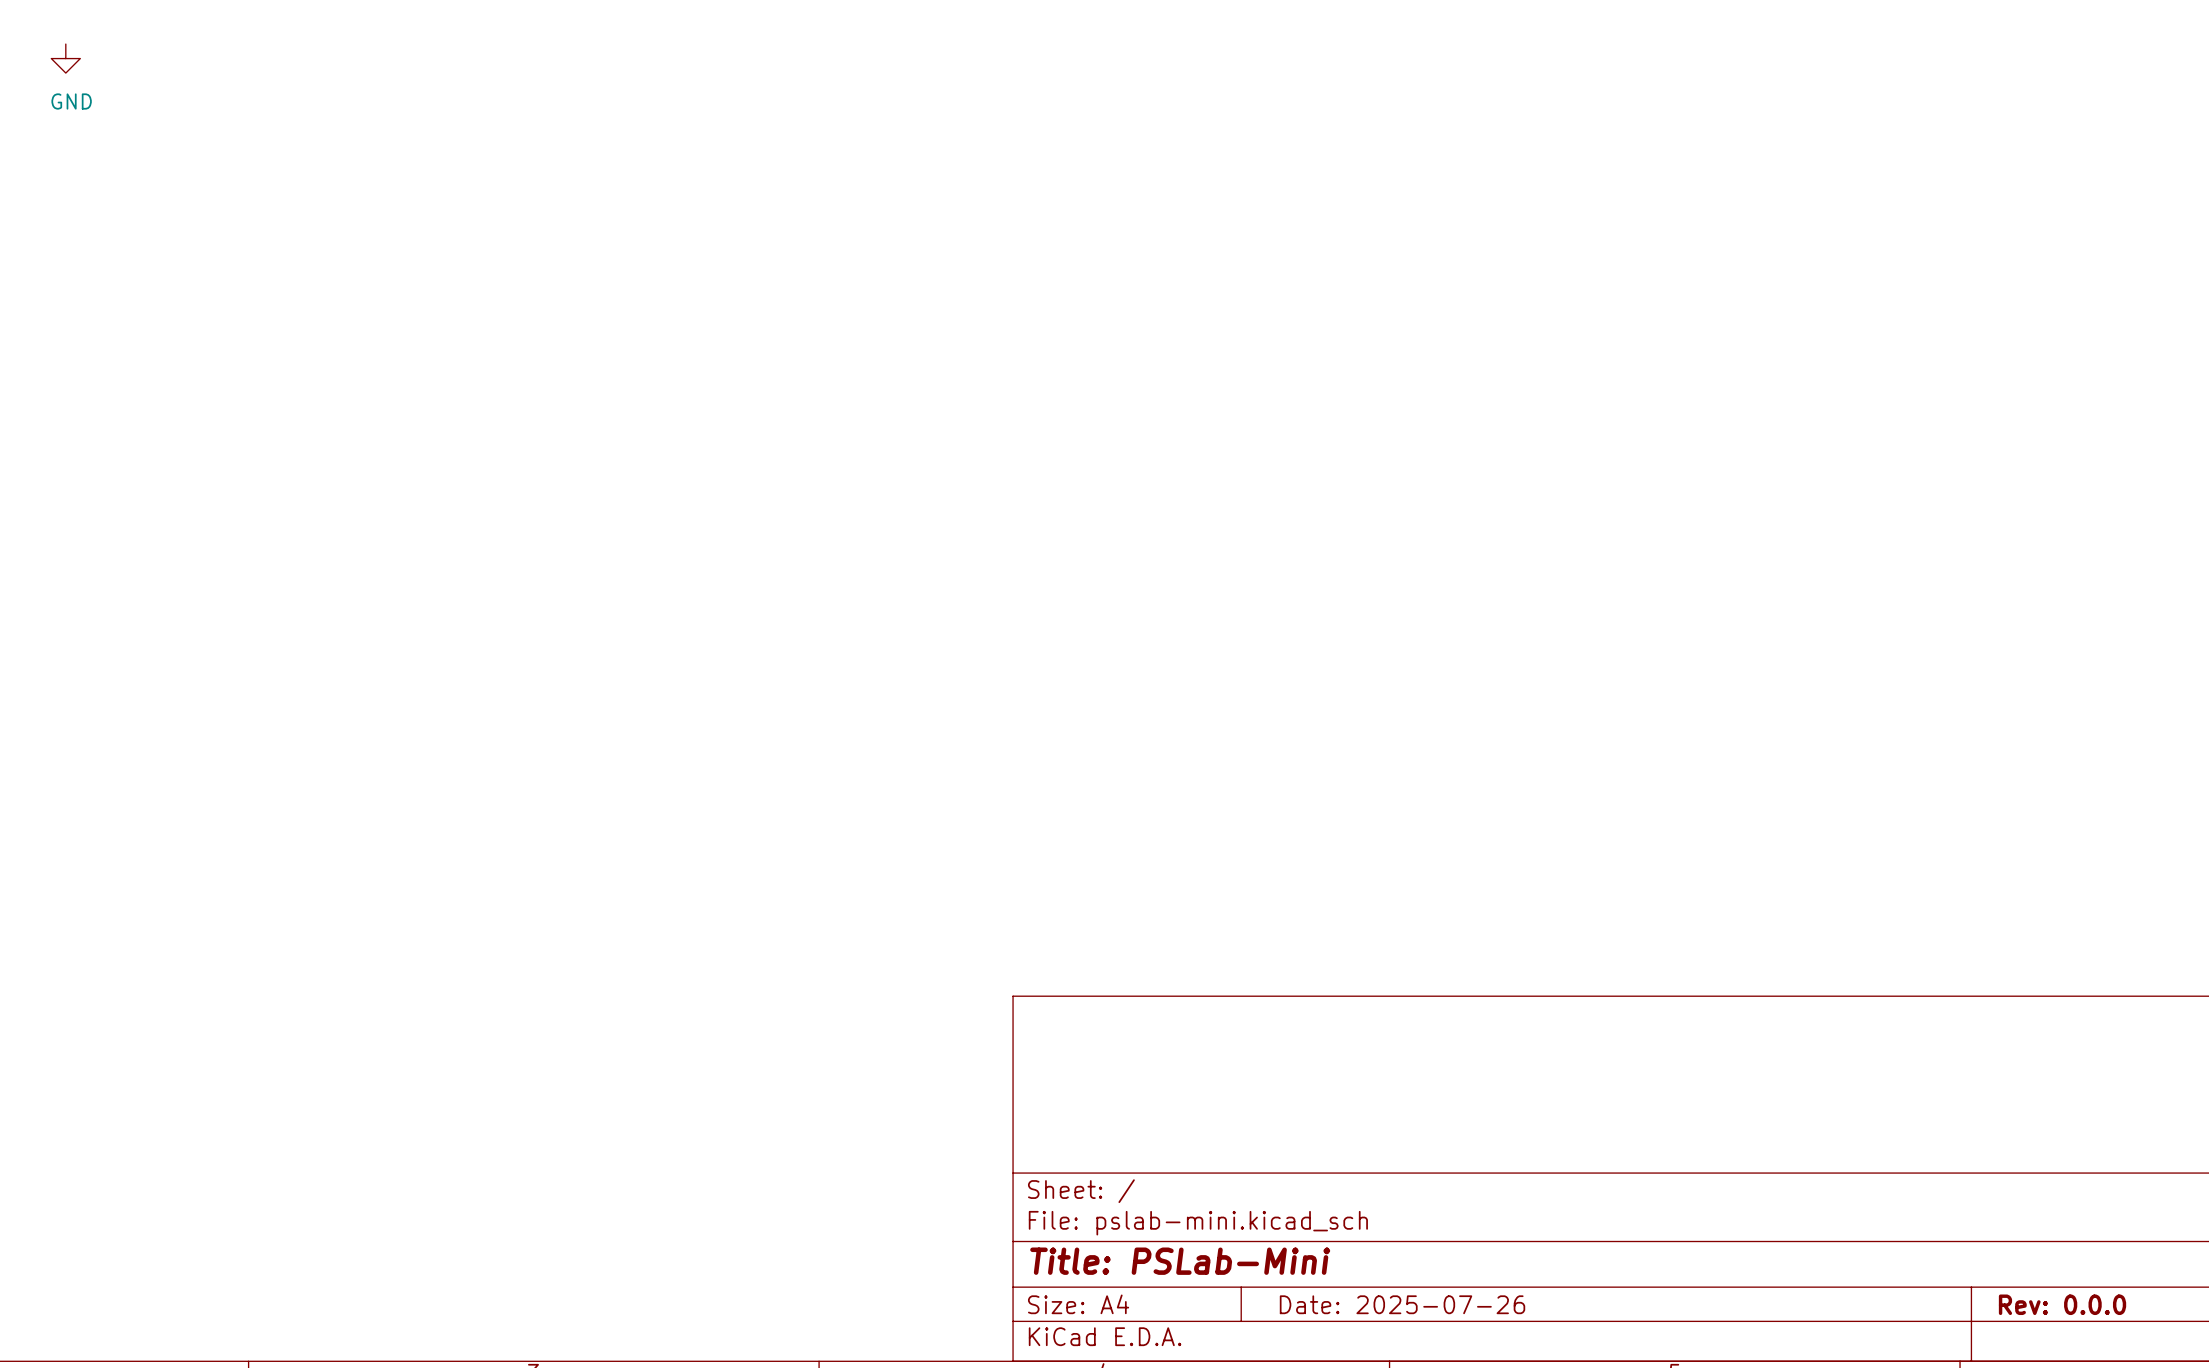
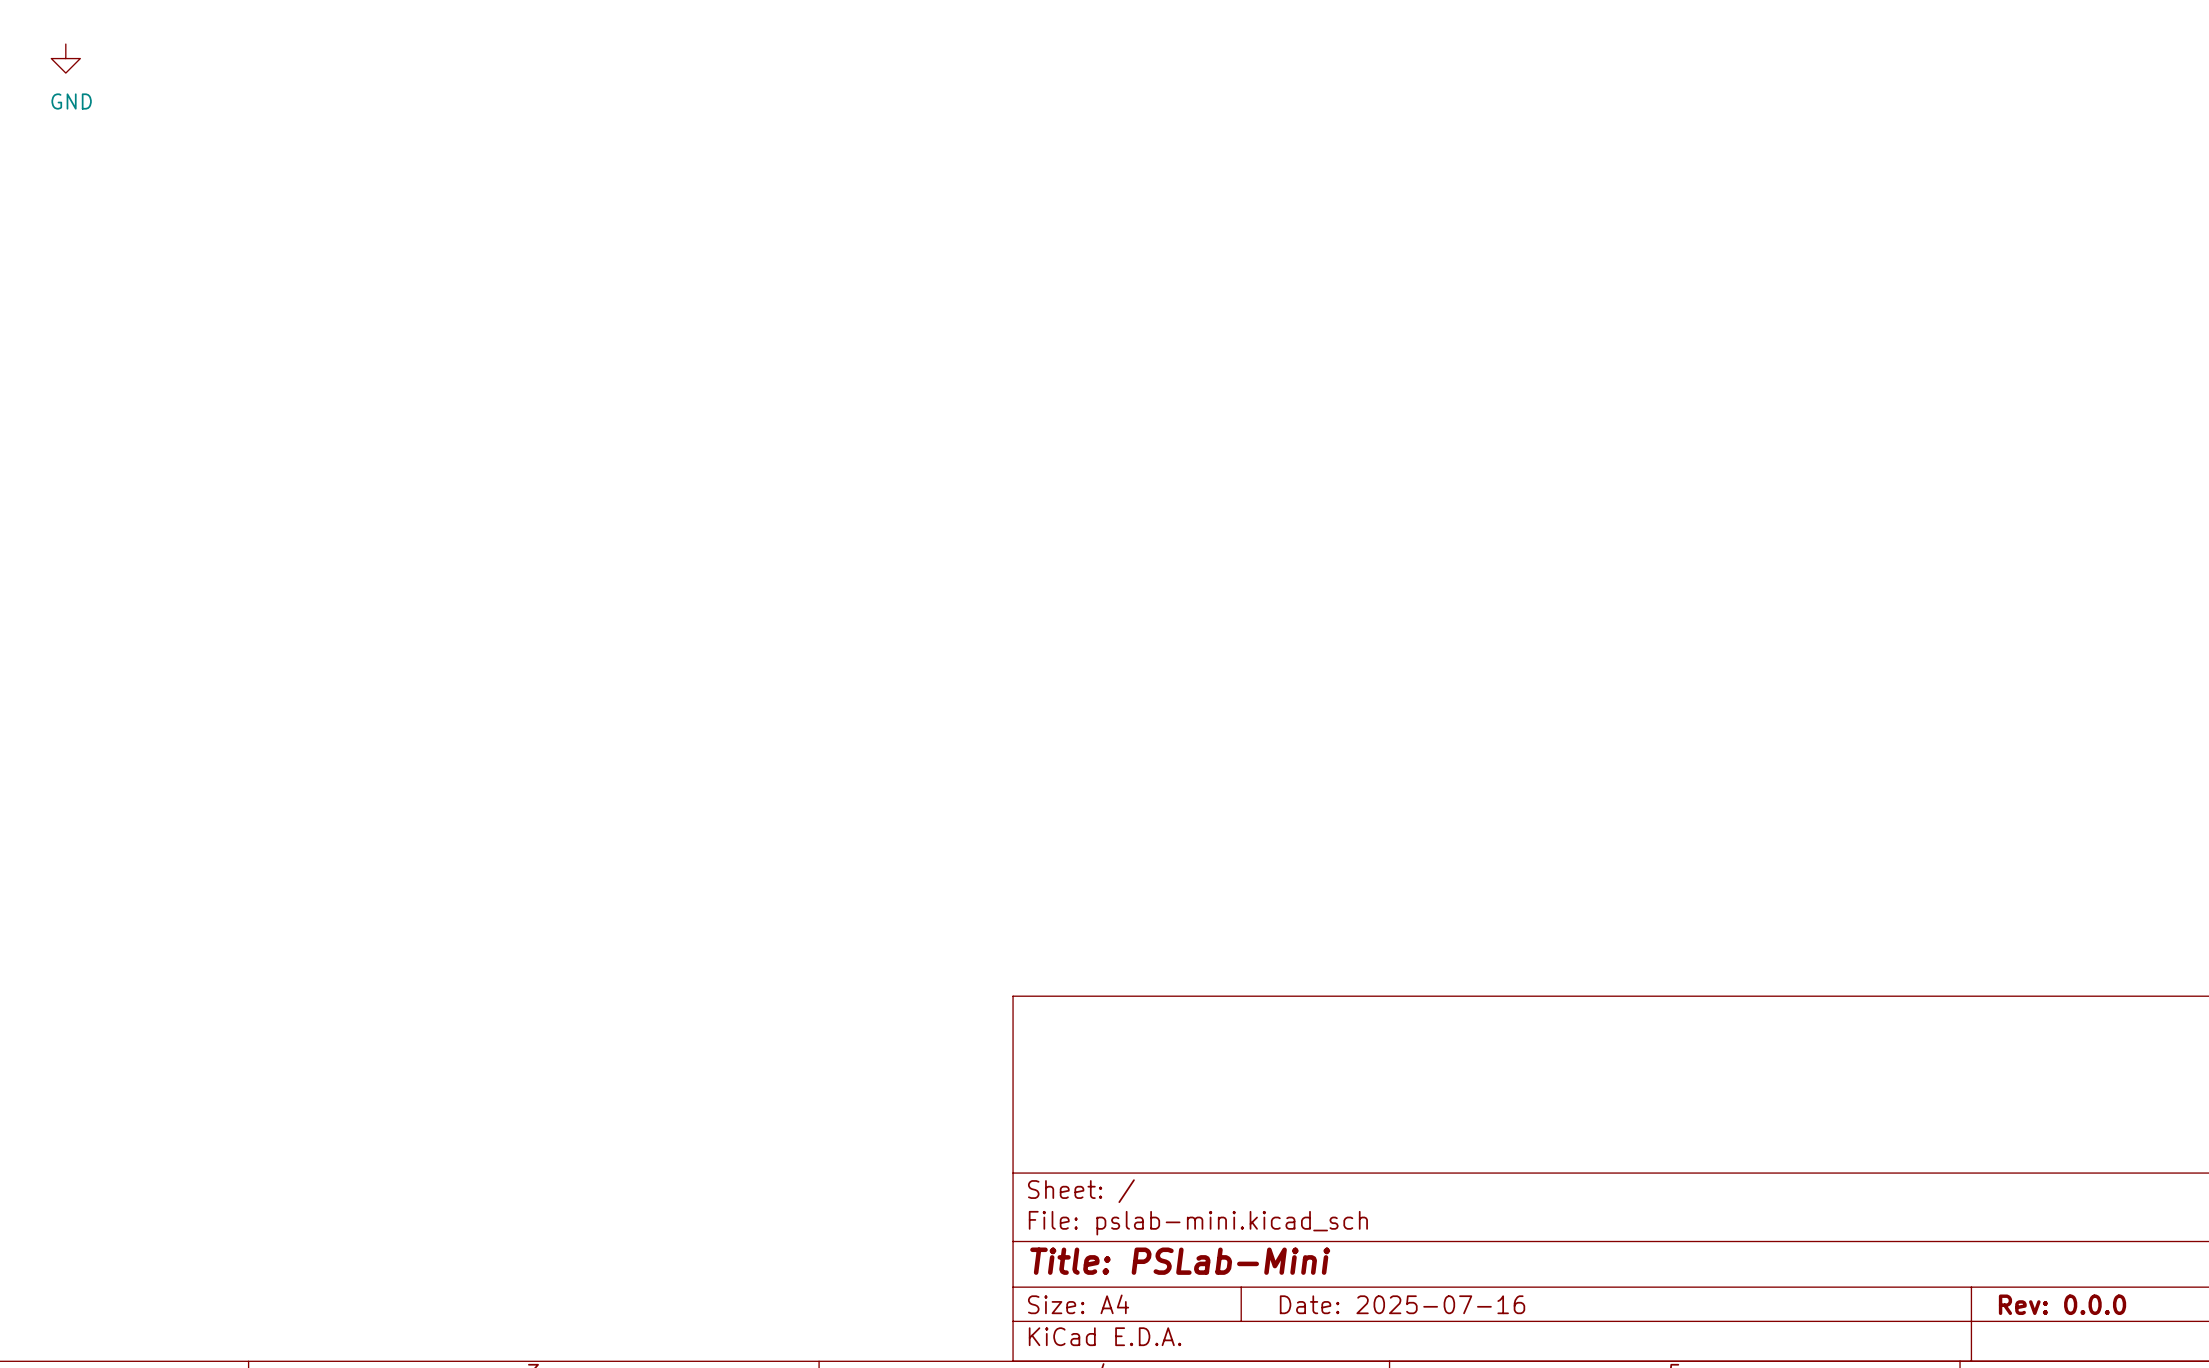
title block: Date: 2025-07-26 (1402, 1304) -> Date: 2025-07-16 (1402, 1304)

